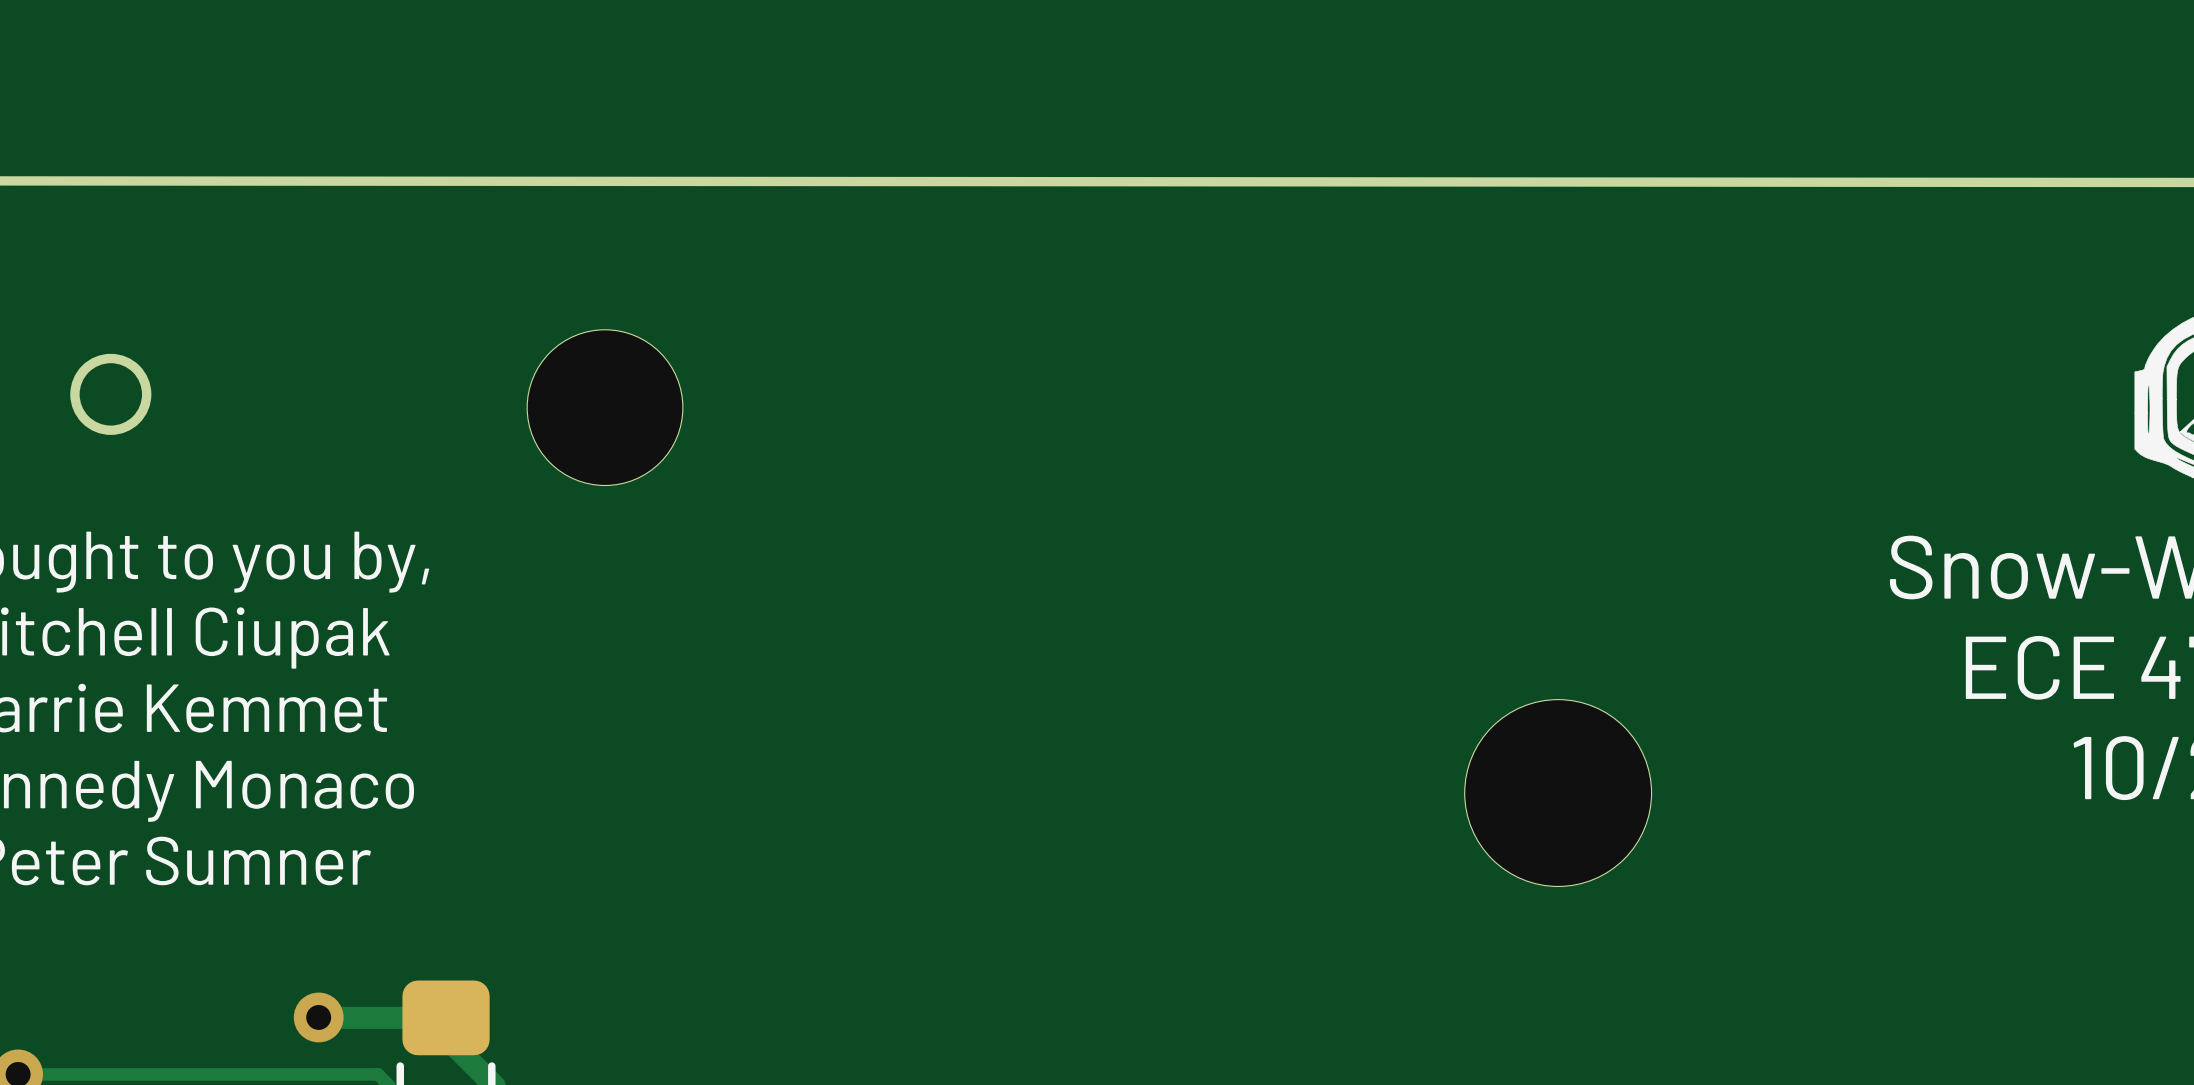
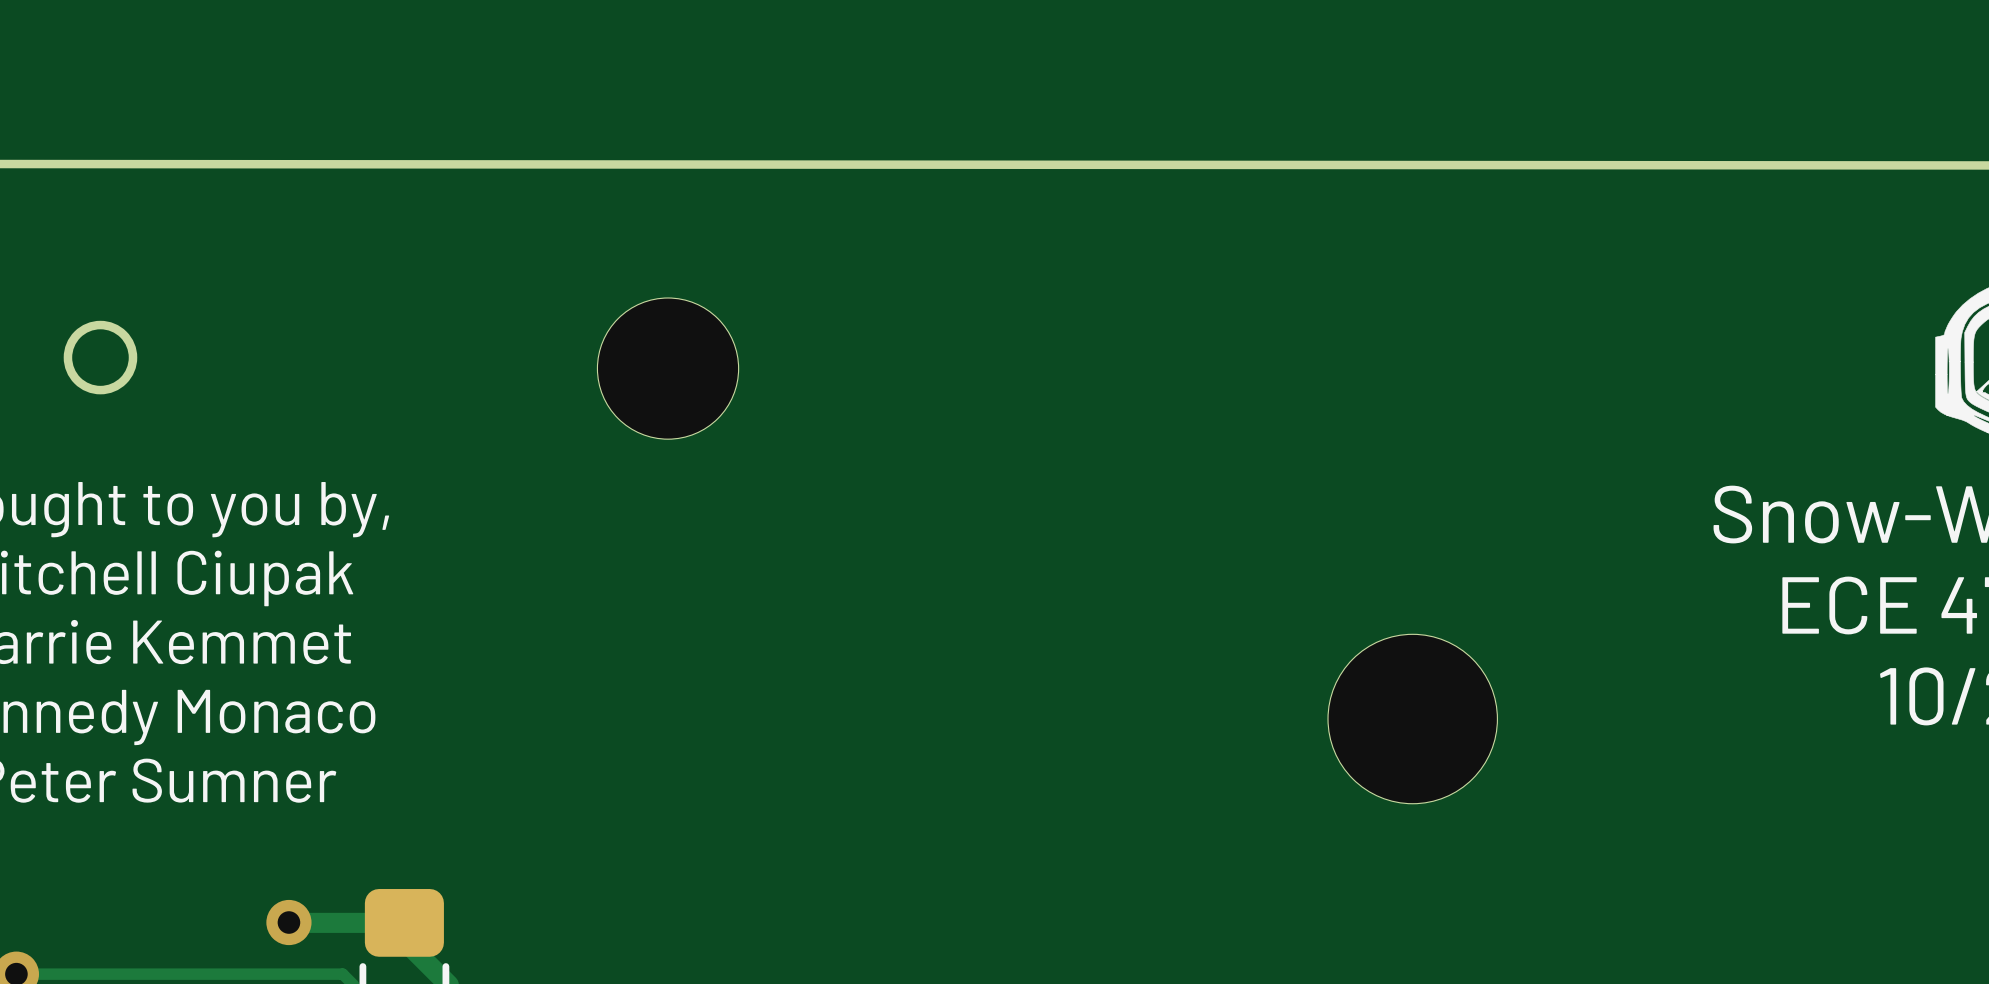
part position: (605, 407) -> (668, 368)

